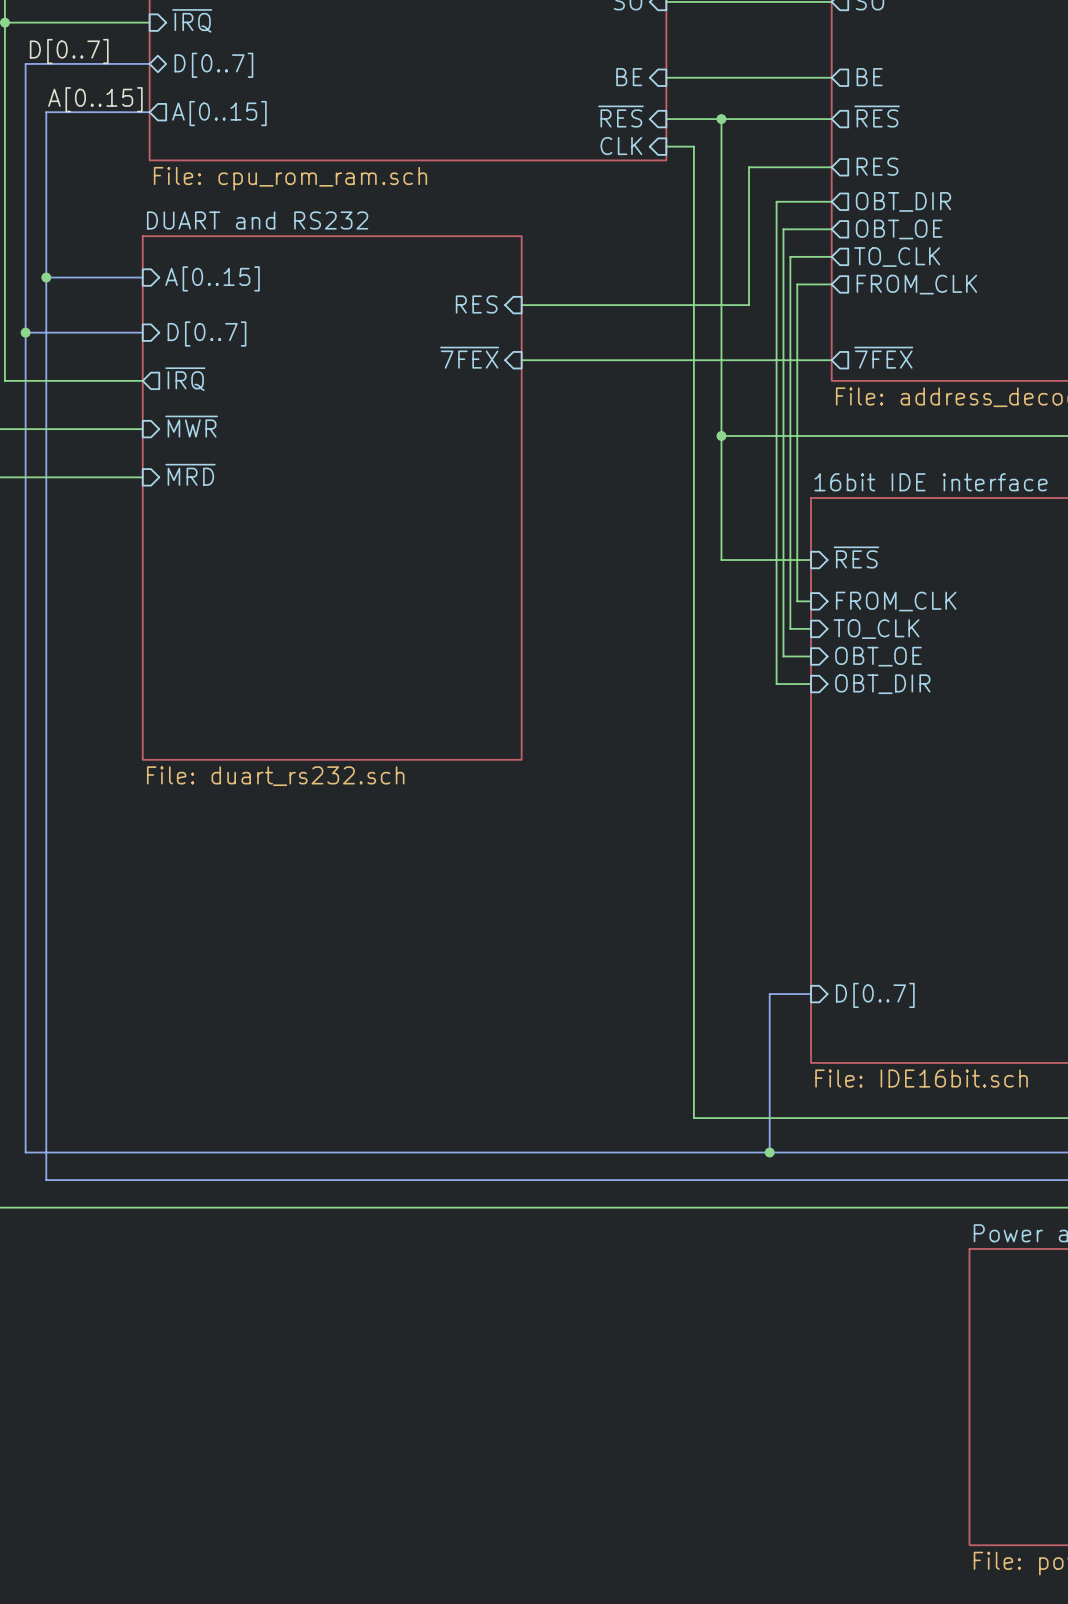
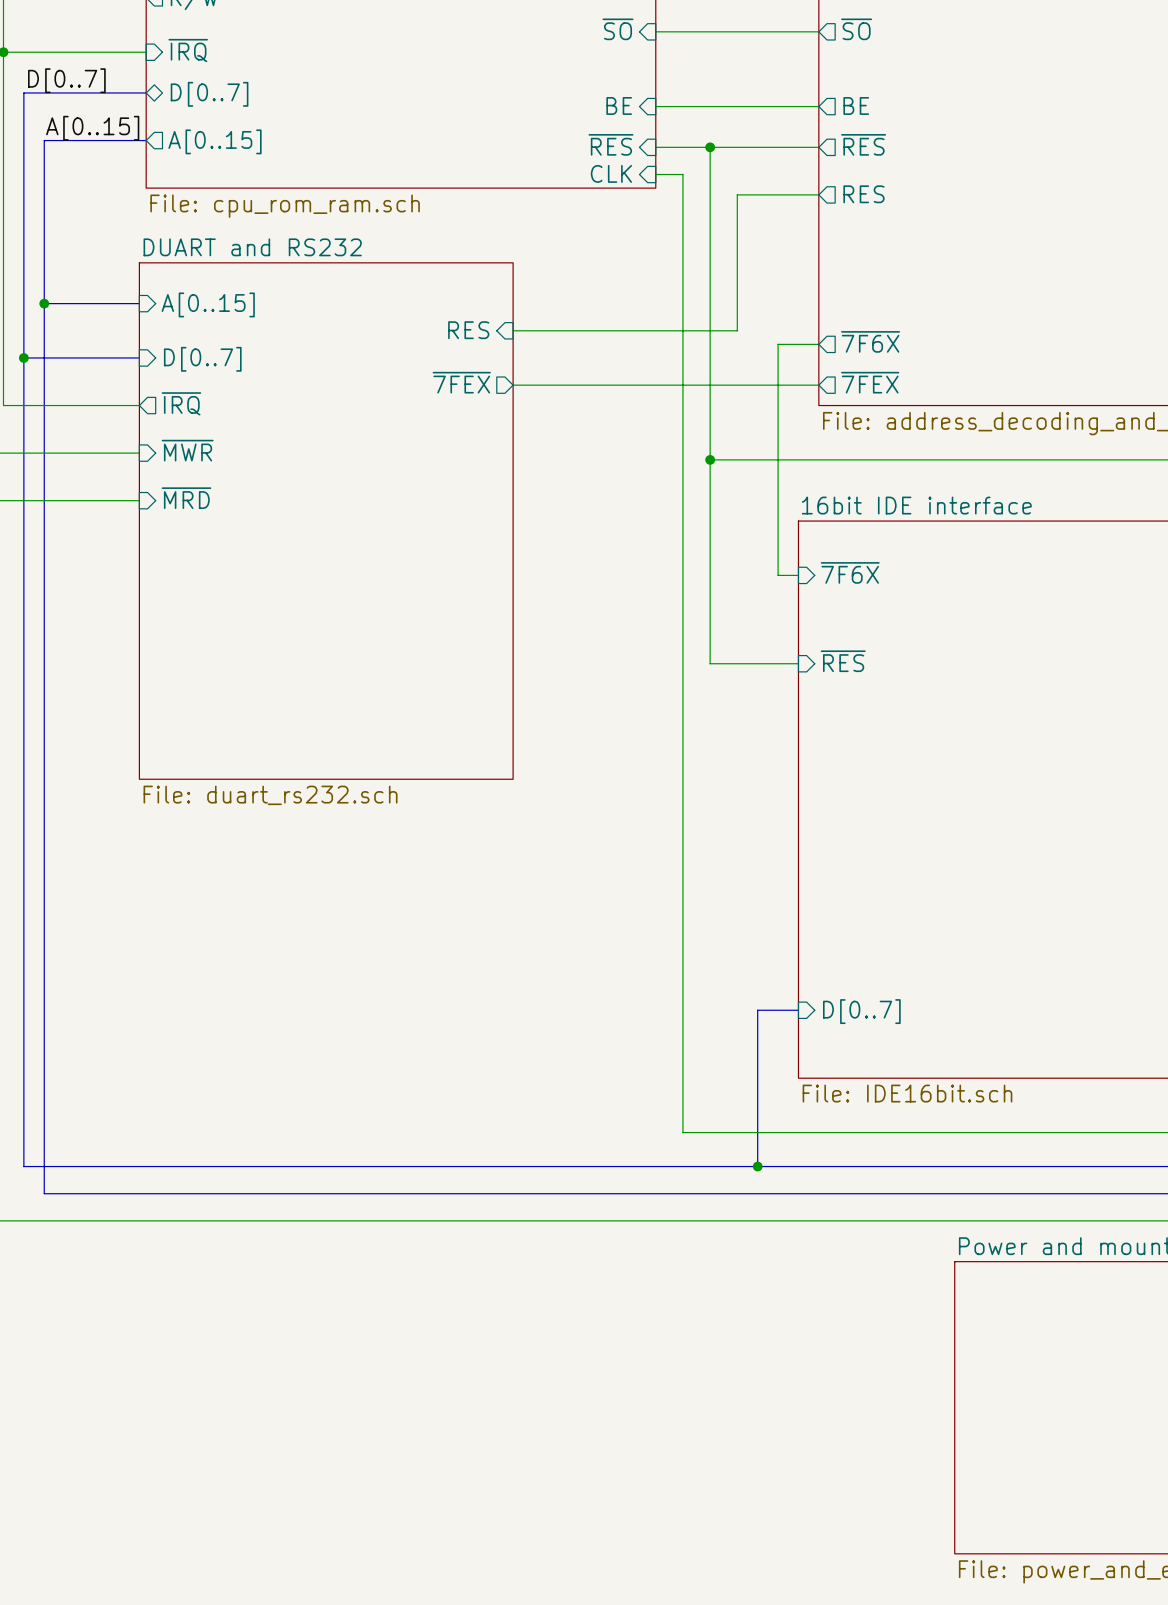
wire: (831, 201) (776, 201) (776, 684) (811, 684) -> none
sheet pin: OBT_DIR (903, 201) -> none
wire: (831, 229) (783, 229) (783, 656) (811, 656) -> none
sheet pin: OBT_OE (899, 229) -> none
wire: (831, 256) (790, 256) (790, 318) -> (818, 344) (778, 344)
sheet pin: TO_CLK (897, 257) -> none
wire: (831, 284) (797, 284) (797, 601) (811, 601) -> none
sheet pin: FROM_CLK (916, 284) -> none
sheet pin: none -> ~{7F6X} (870, 341)
sheet pin shape: input (469, 357) -> output (461, 382)
sheet pin: none -> ~{7F6X} (850, 572)
wire: (790, 553) (790, 628) (811, 628) -> (778, 575) (798, 575)
sheet pin position: ~{RES} (856, 557) -> ~{RES} (843, 661)
wire: (721, 560) (811, 560) -> (710, 582) (710, 663) (798, 663)
sheet pin: FROM_CLK (896, 601) -> none
sheet pin: TO_CLK (876, 629) -> none
sheet pin: OBT_OE (878, 656) -> none
sheet pin: OBT_DIR (882, 684) -> none

